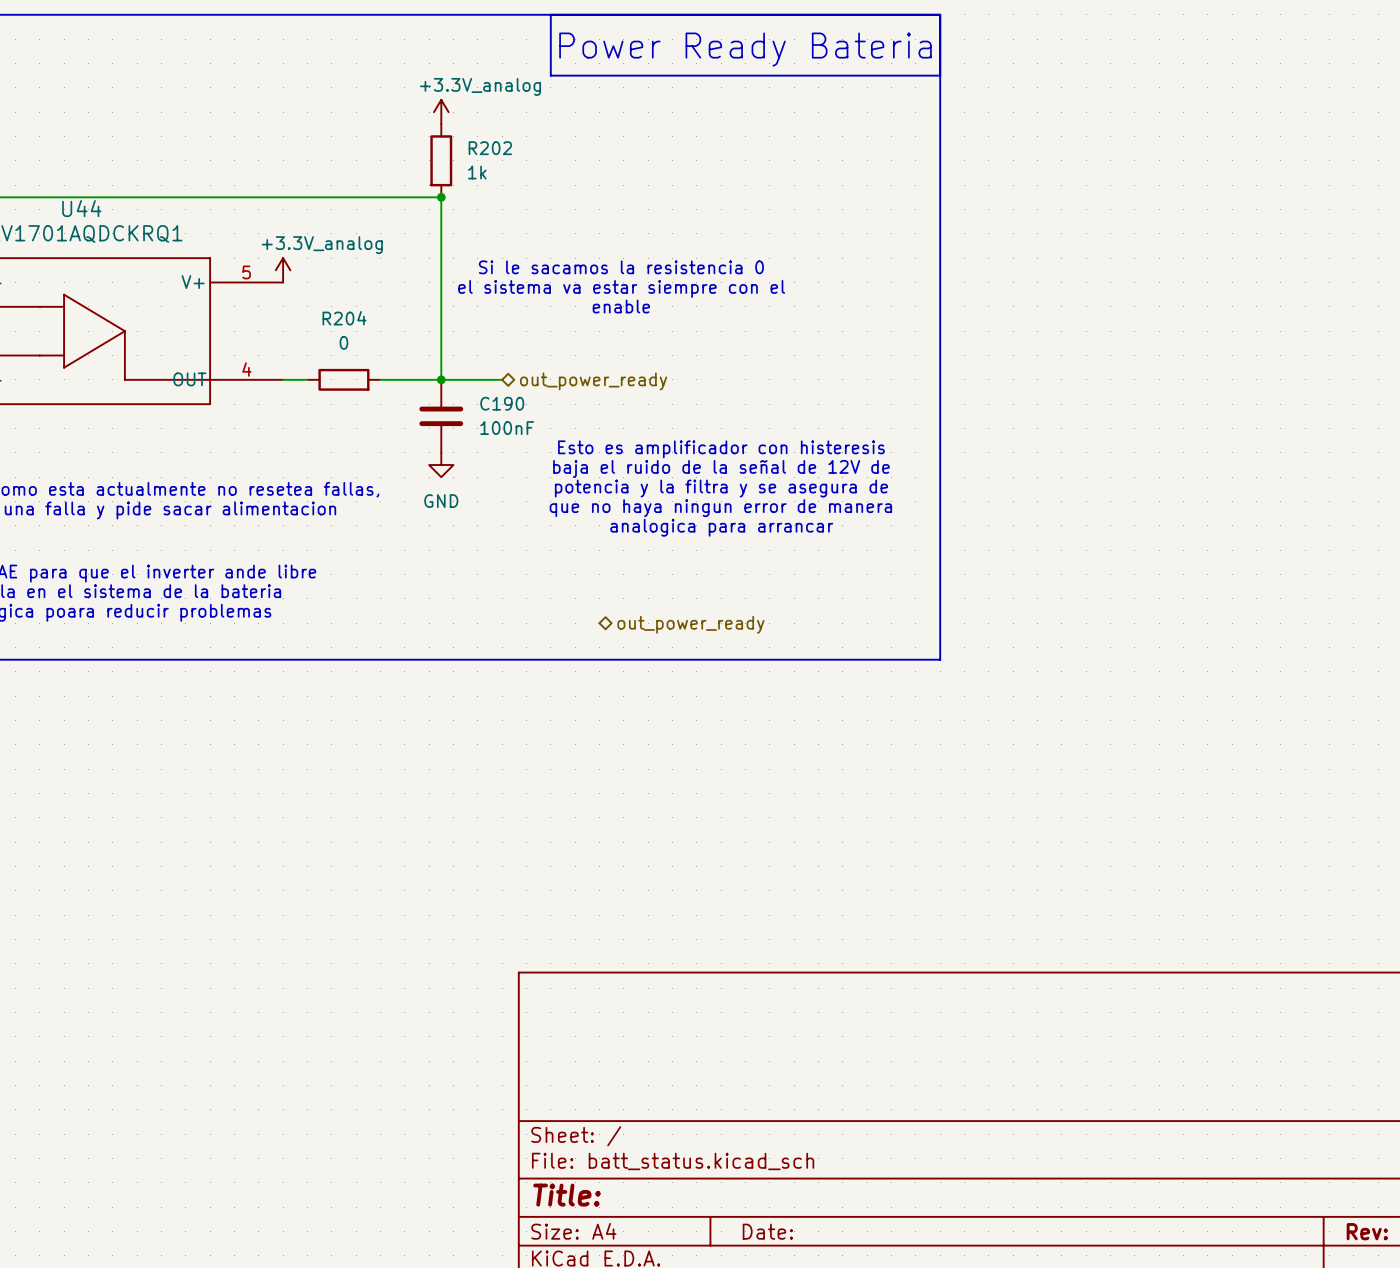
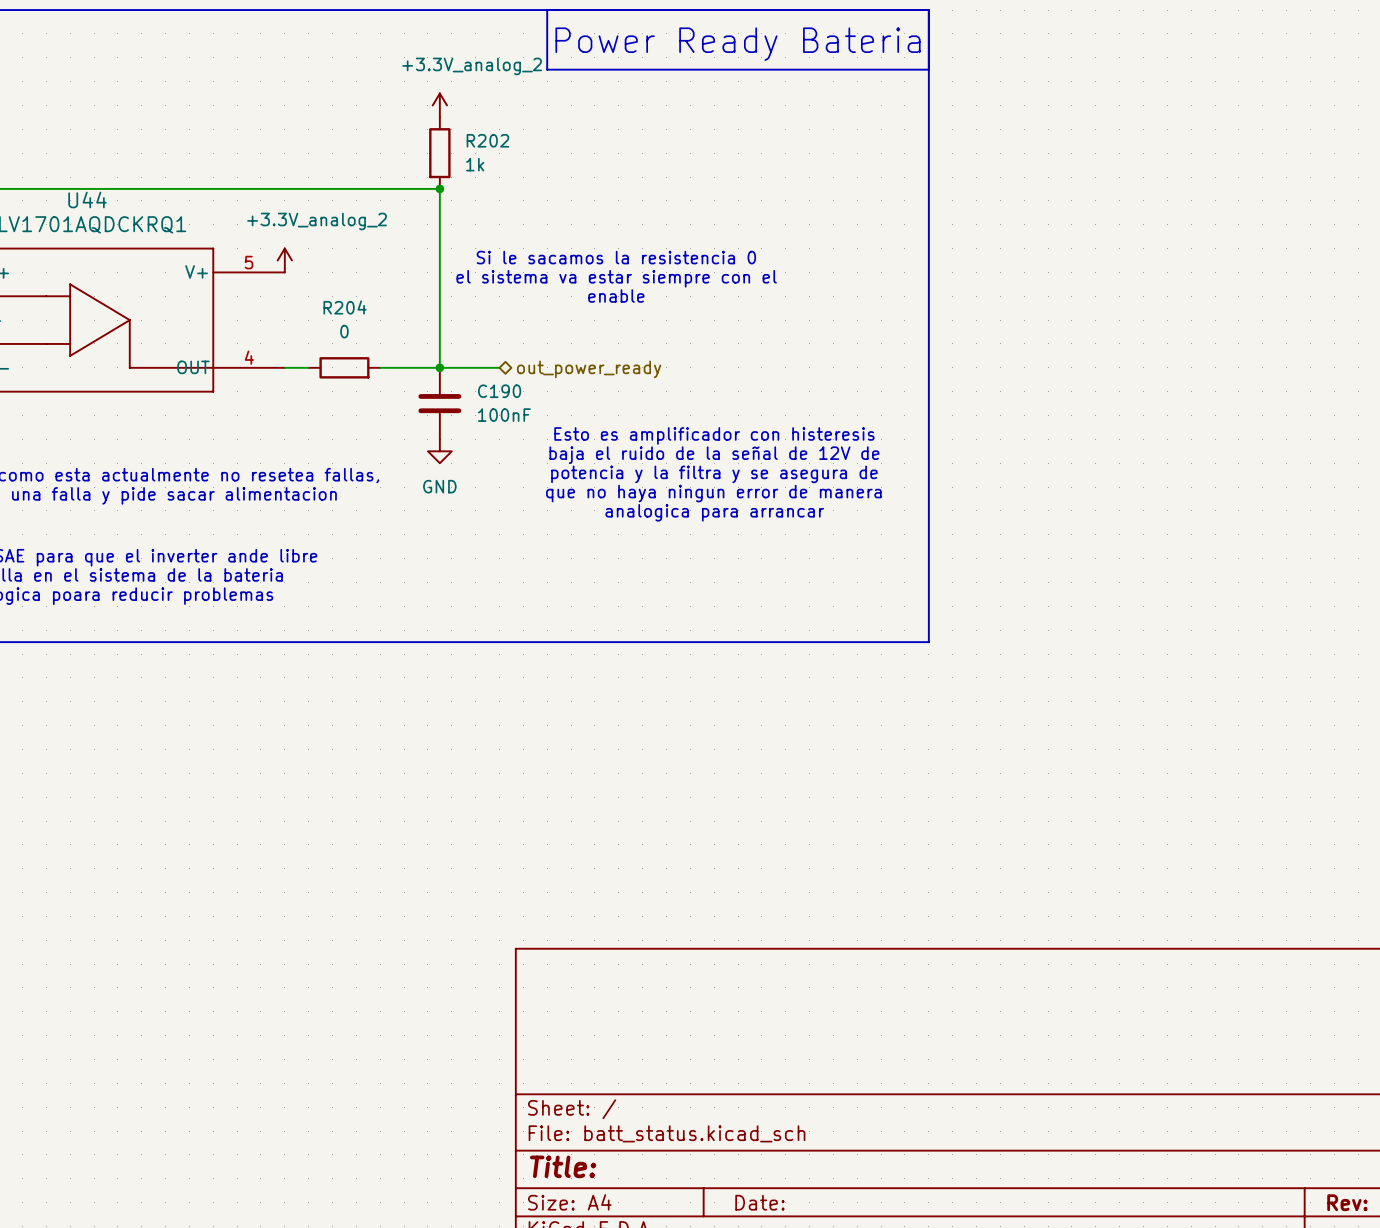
power symbol: +3.3V_analog (441, 112) -> +3.3V_analog_2 (439, 105)
power symbol: +3.3V_analog (283, 270) -> +3.3V_analog_2 (284, 260)
hierarchical label: out_power_ready (690, 624) -> none

